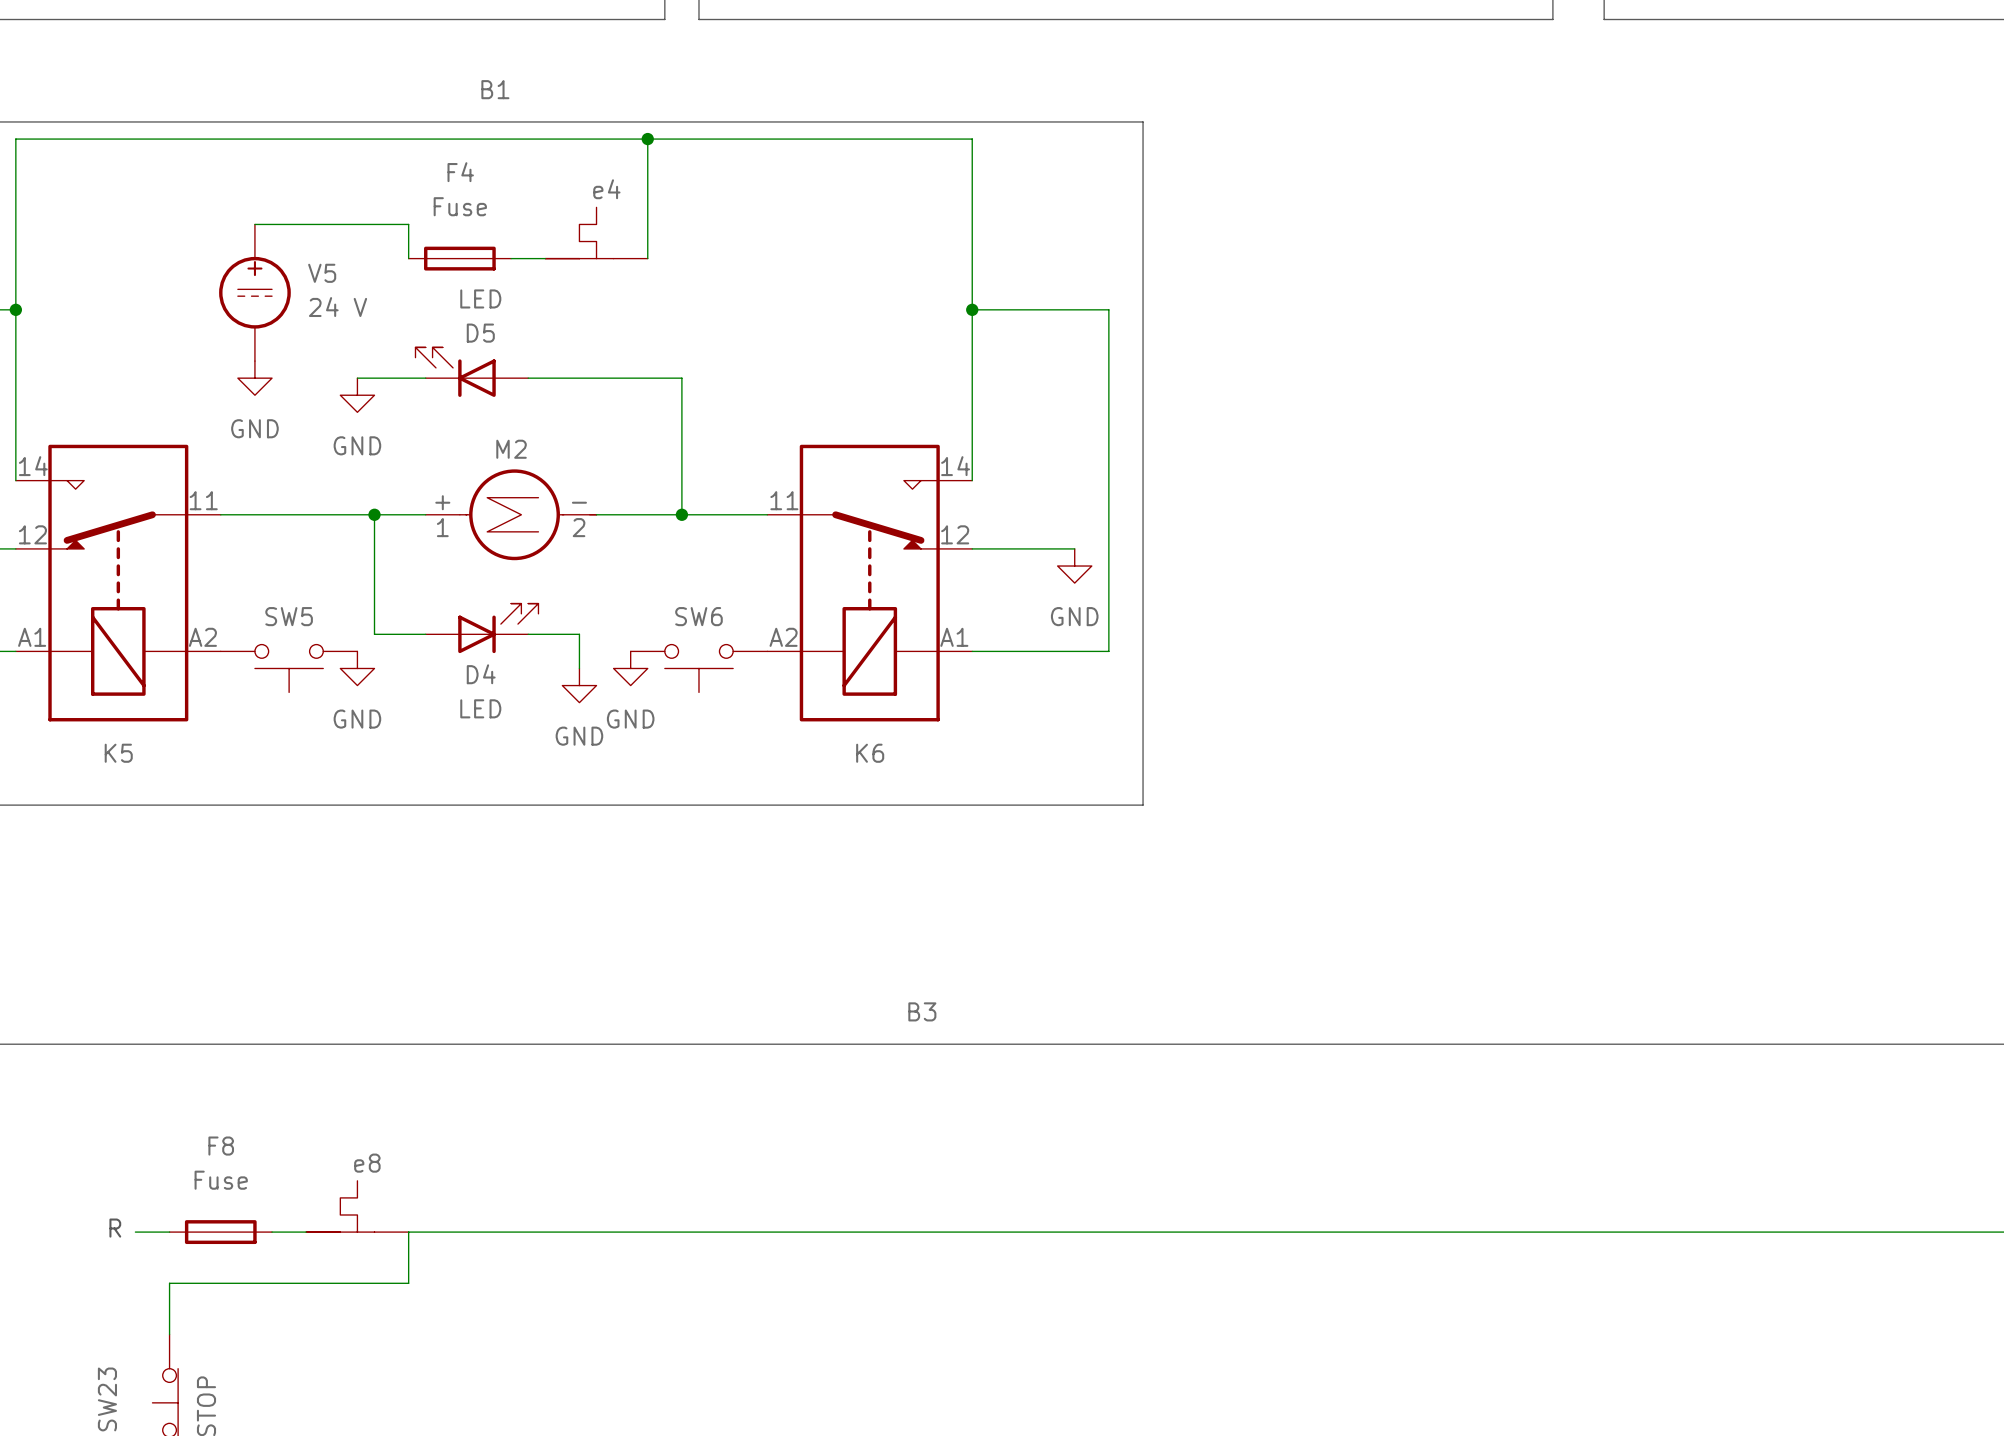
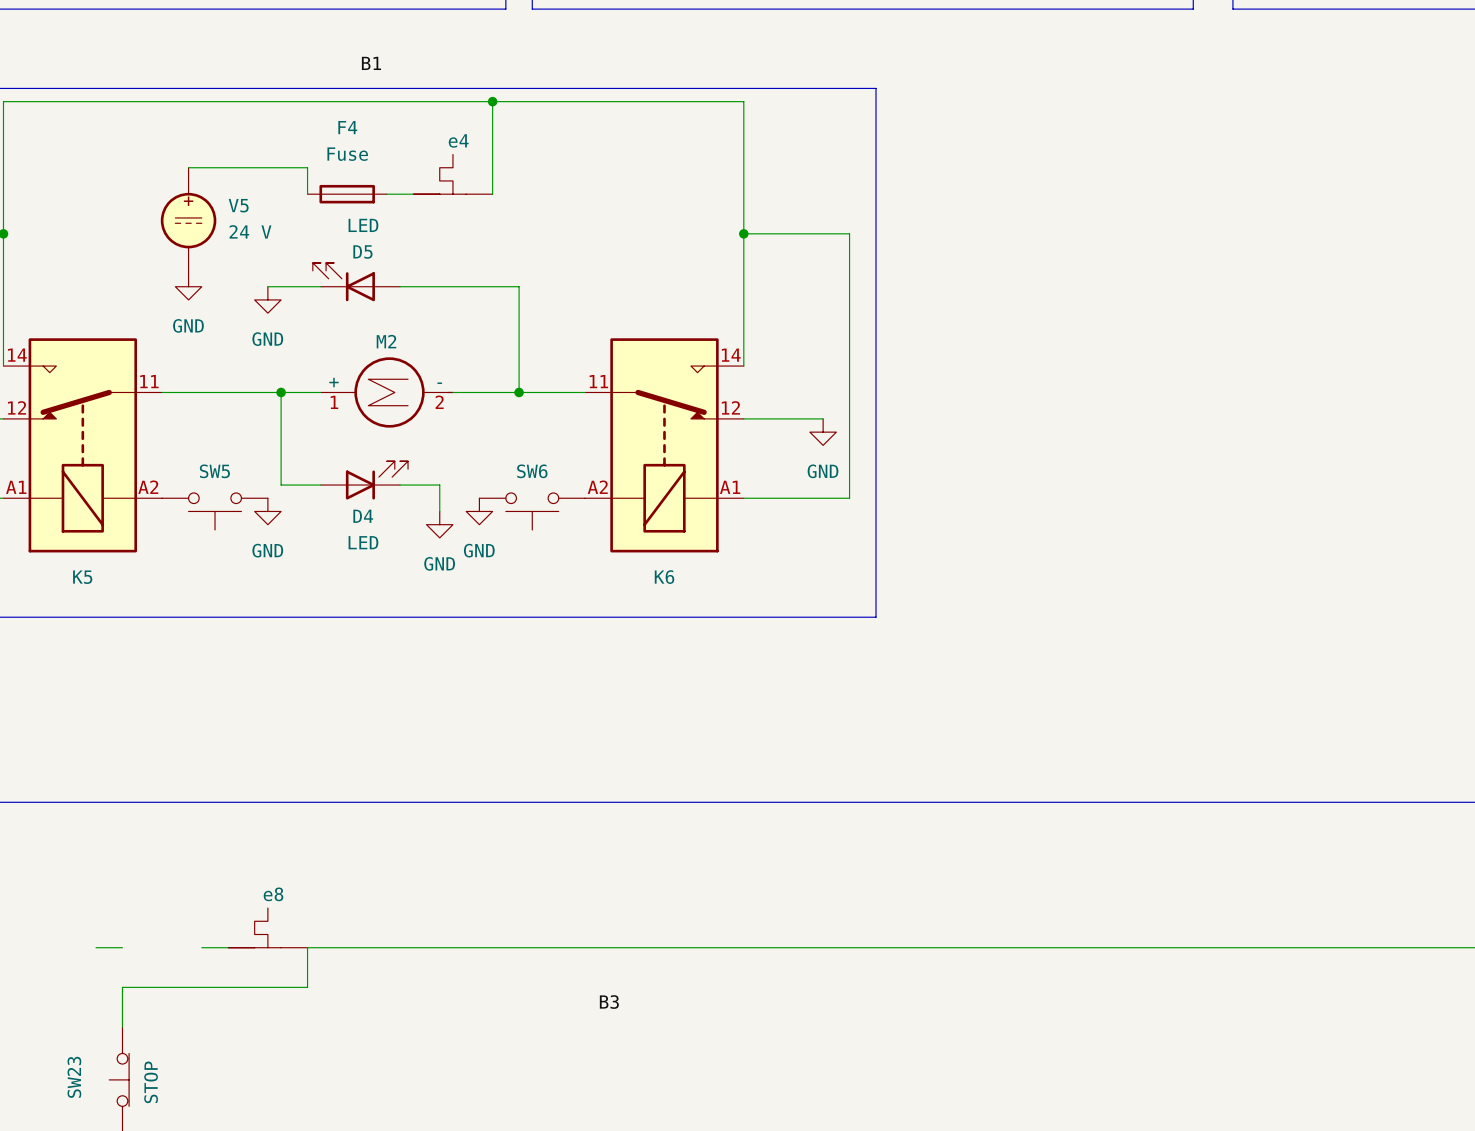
label position: B3 (922, 1011) -> B3 (609, 1002)
text: R (115, 1228) -> none
F8: Fuse (220, 1232) -> none

